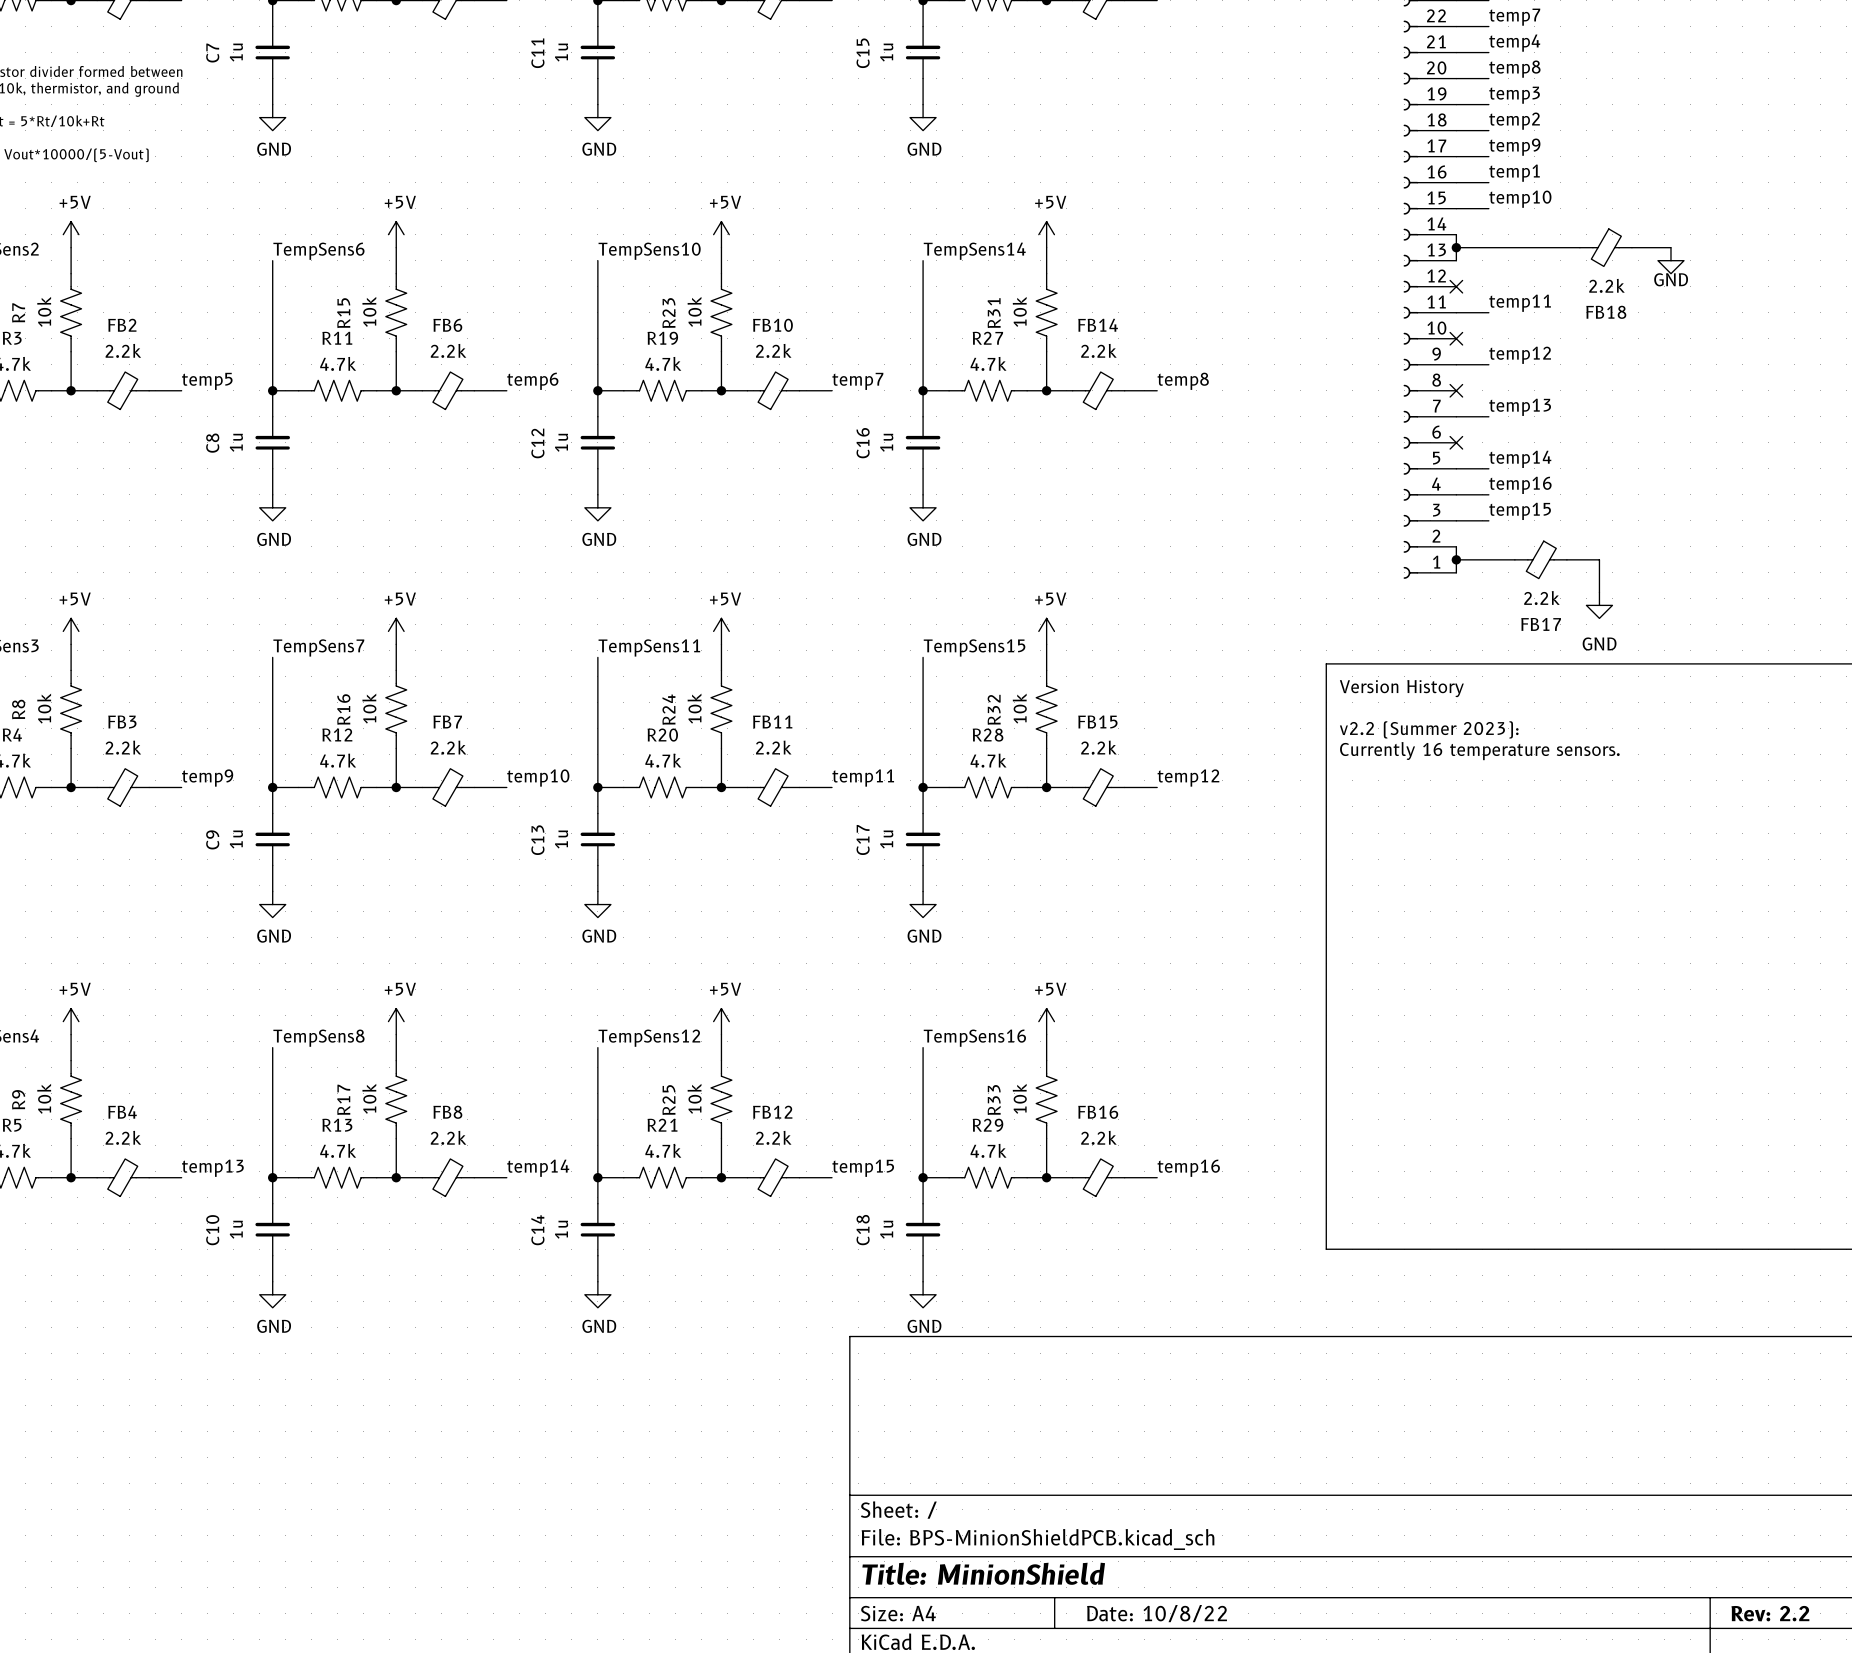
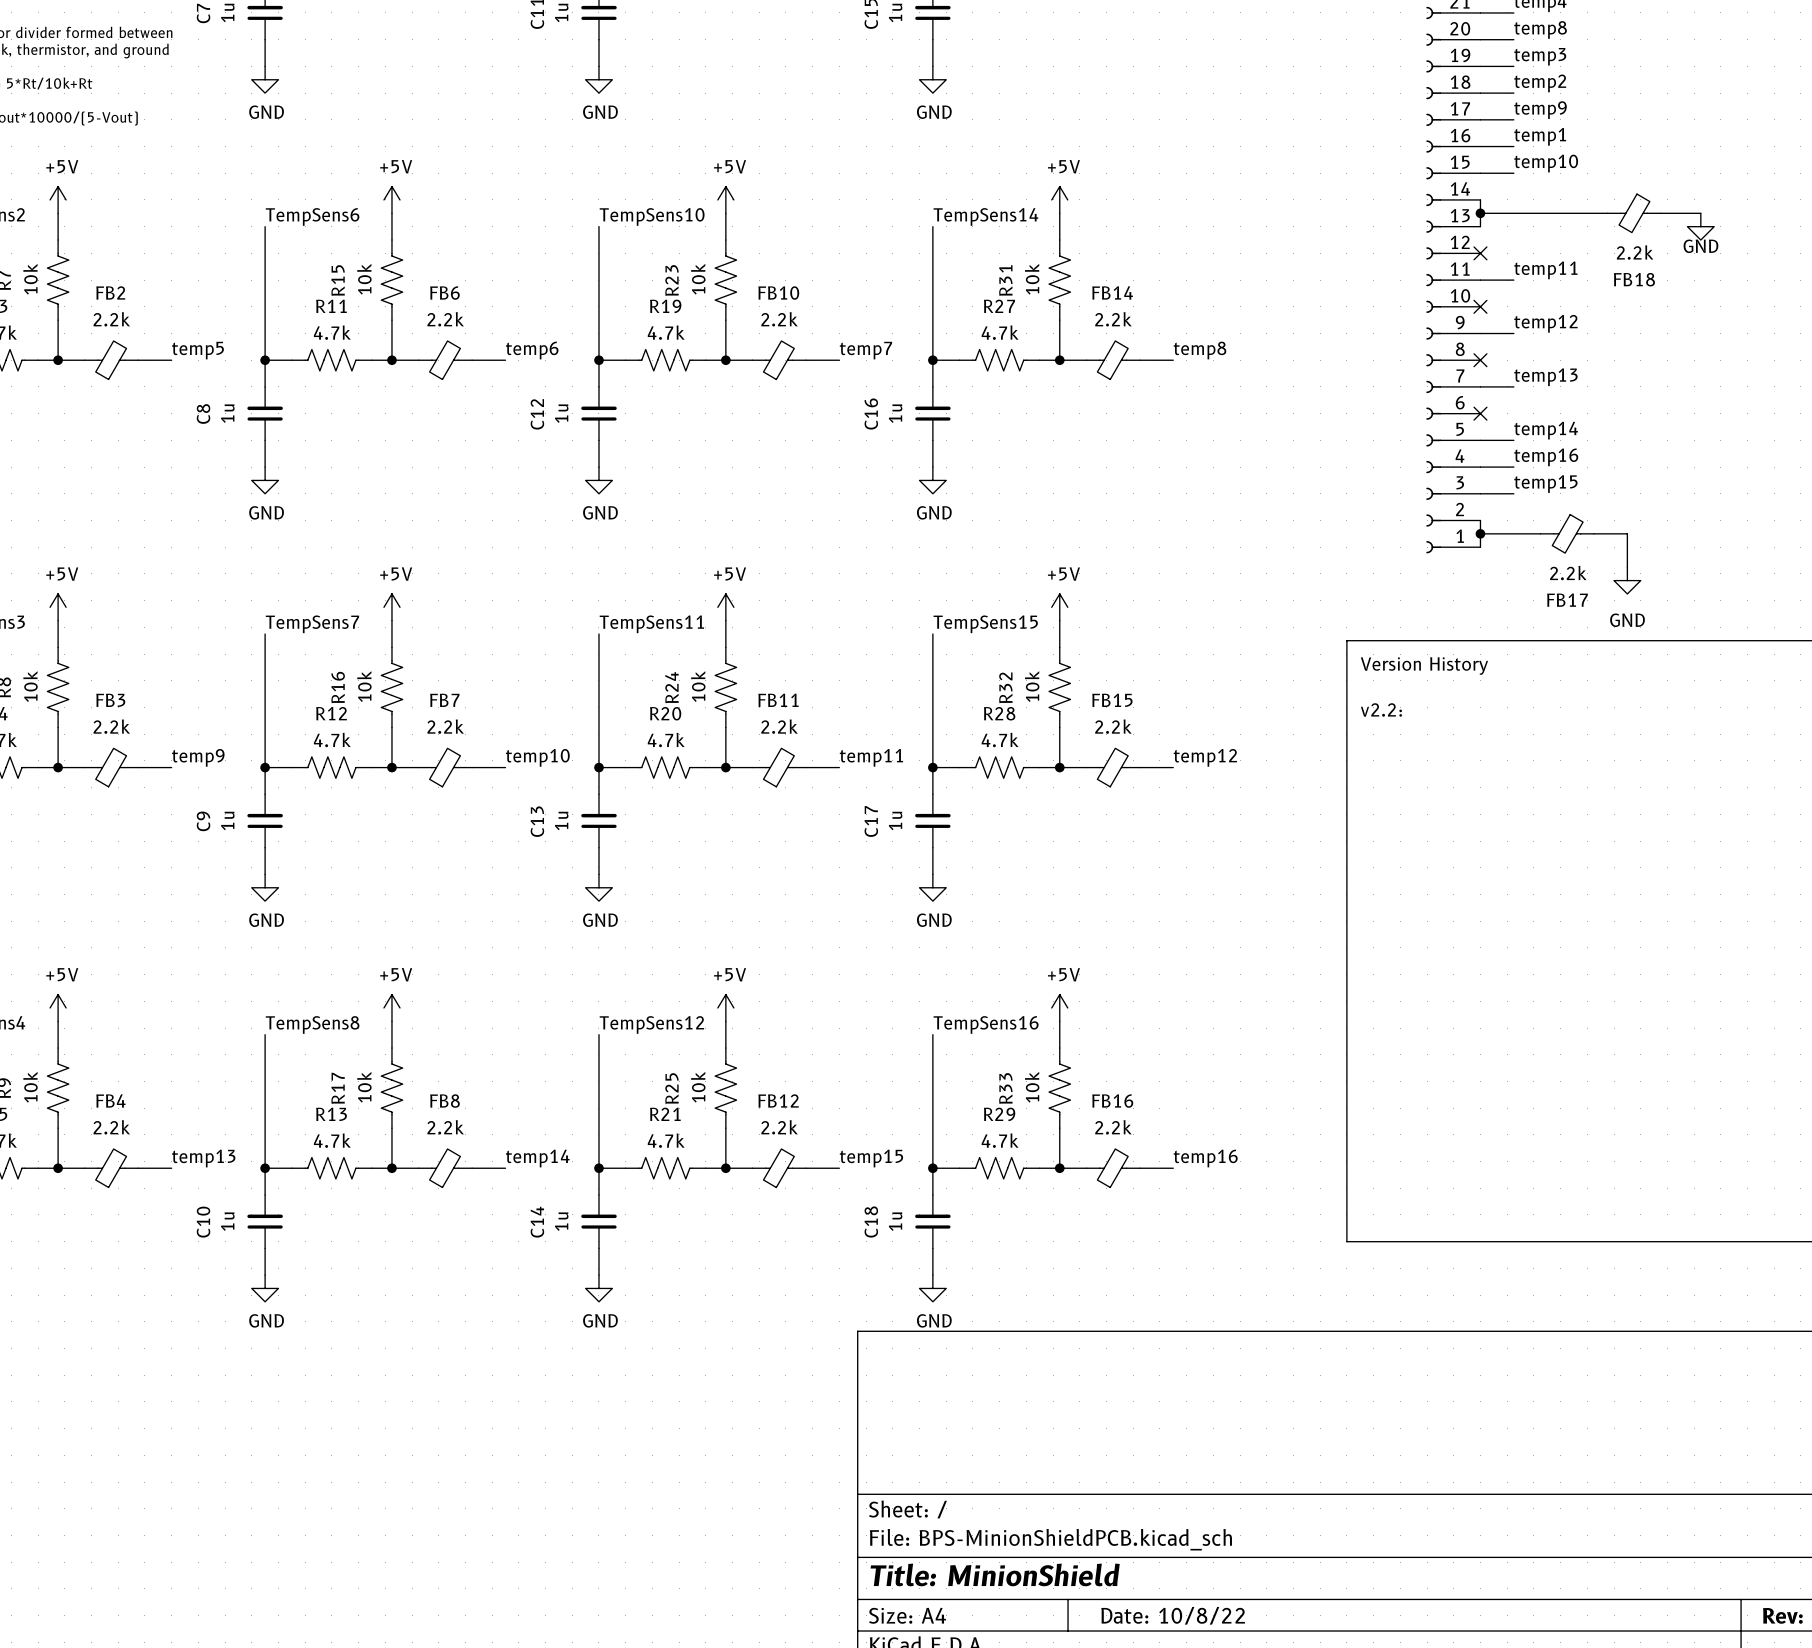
text: v2.2 (Summer 2023): (1429, 729) -> v2.2: (1381, 709)
text: Currently 16 temperature sensors. (1479, 751) -> none

